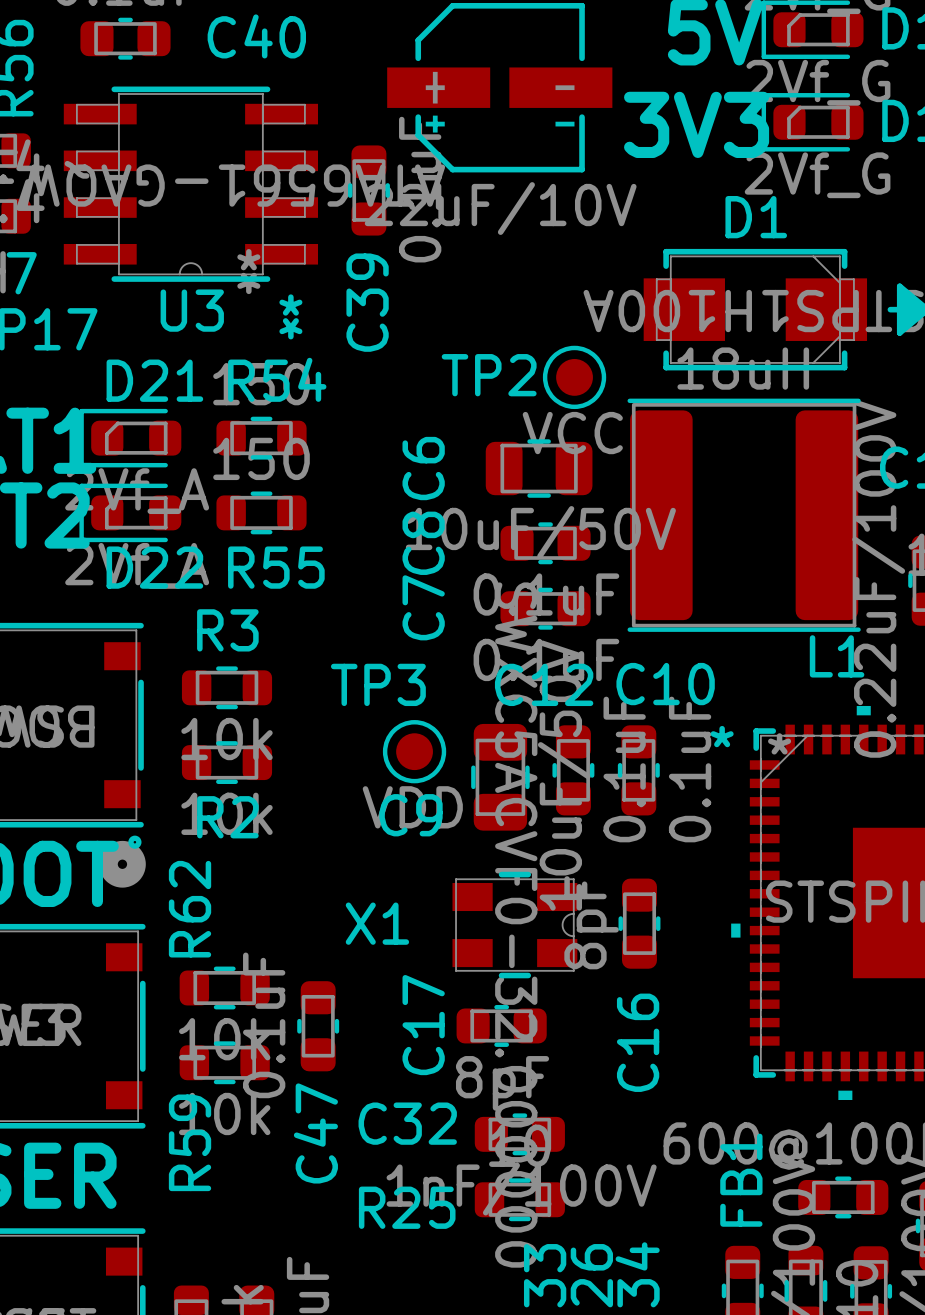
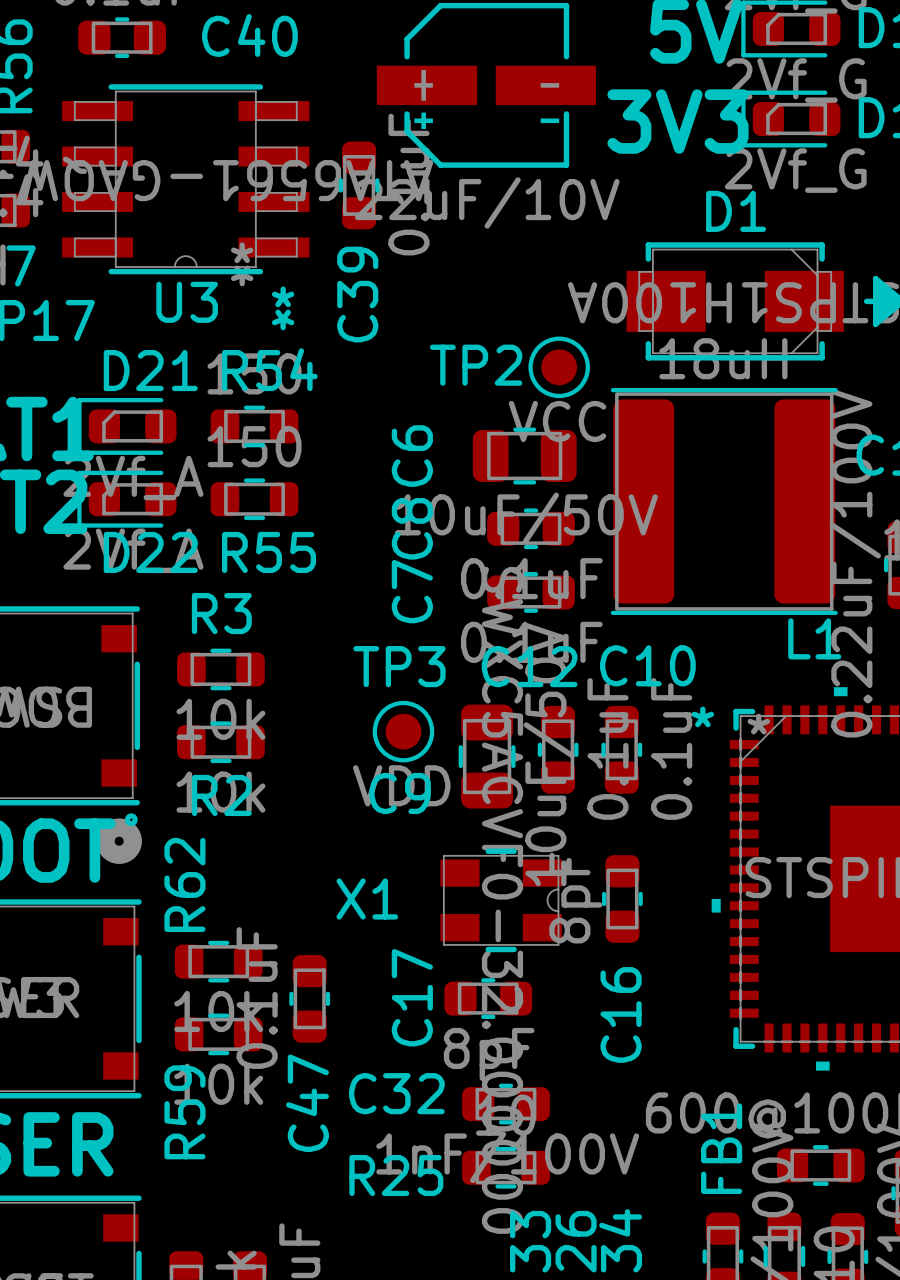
TP3 name position: TP3 (378, 684) -> TP3 (399, 666)

